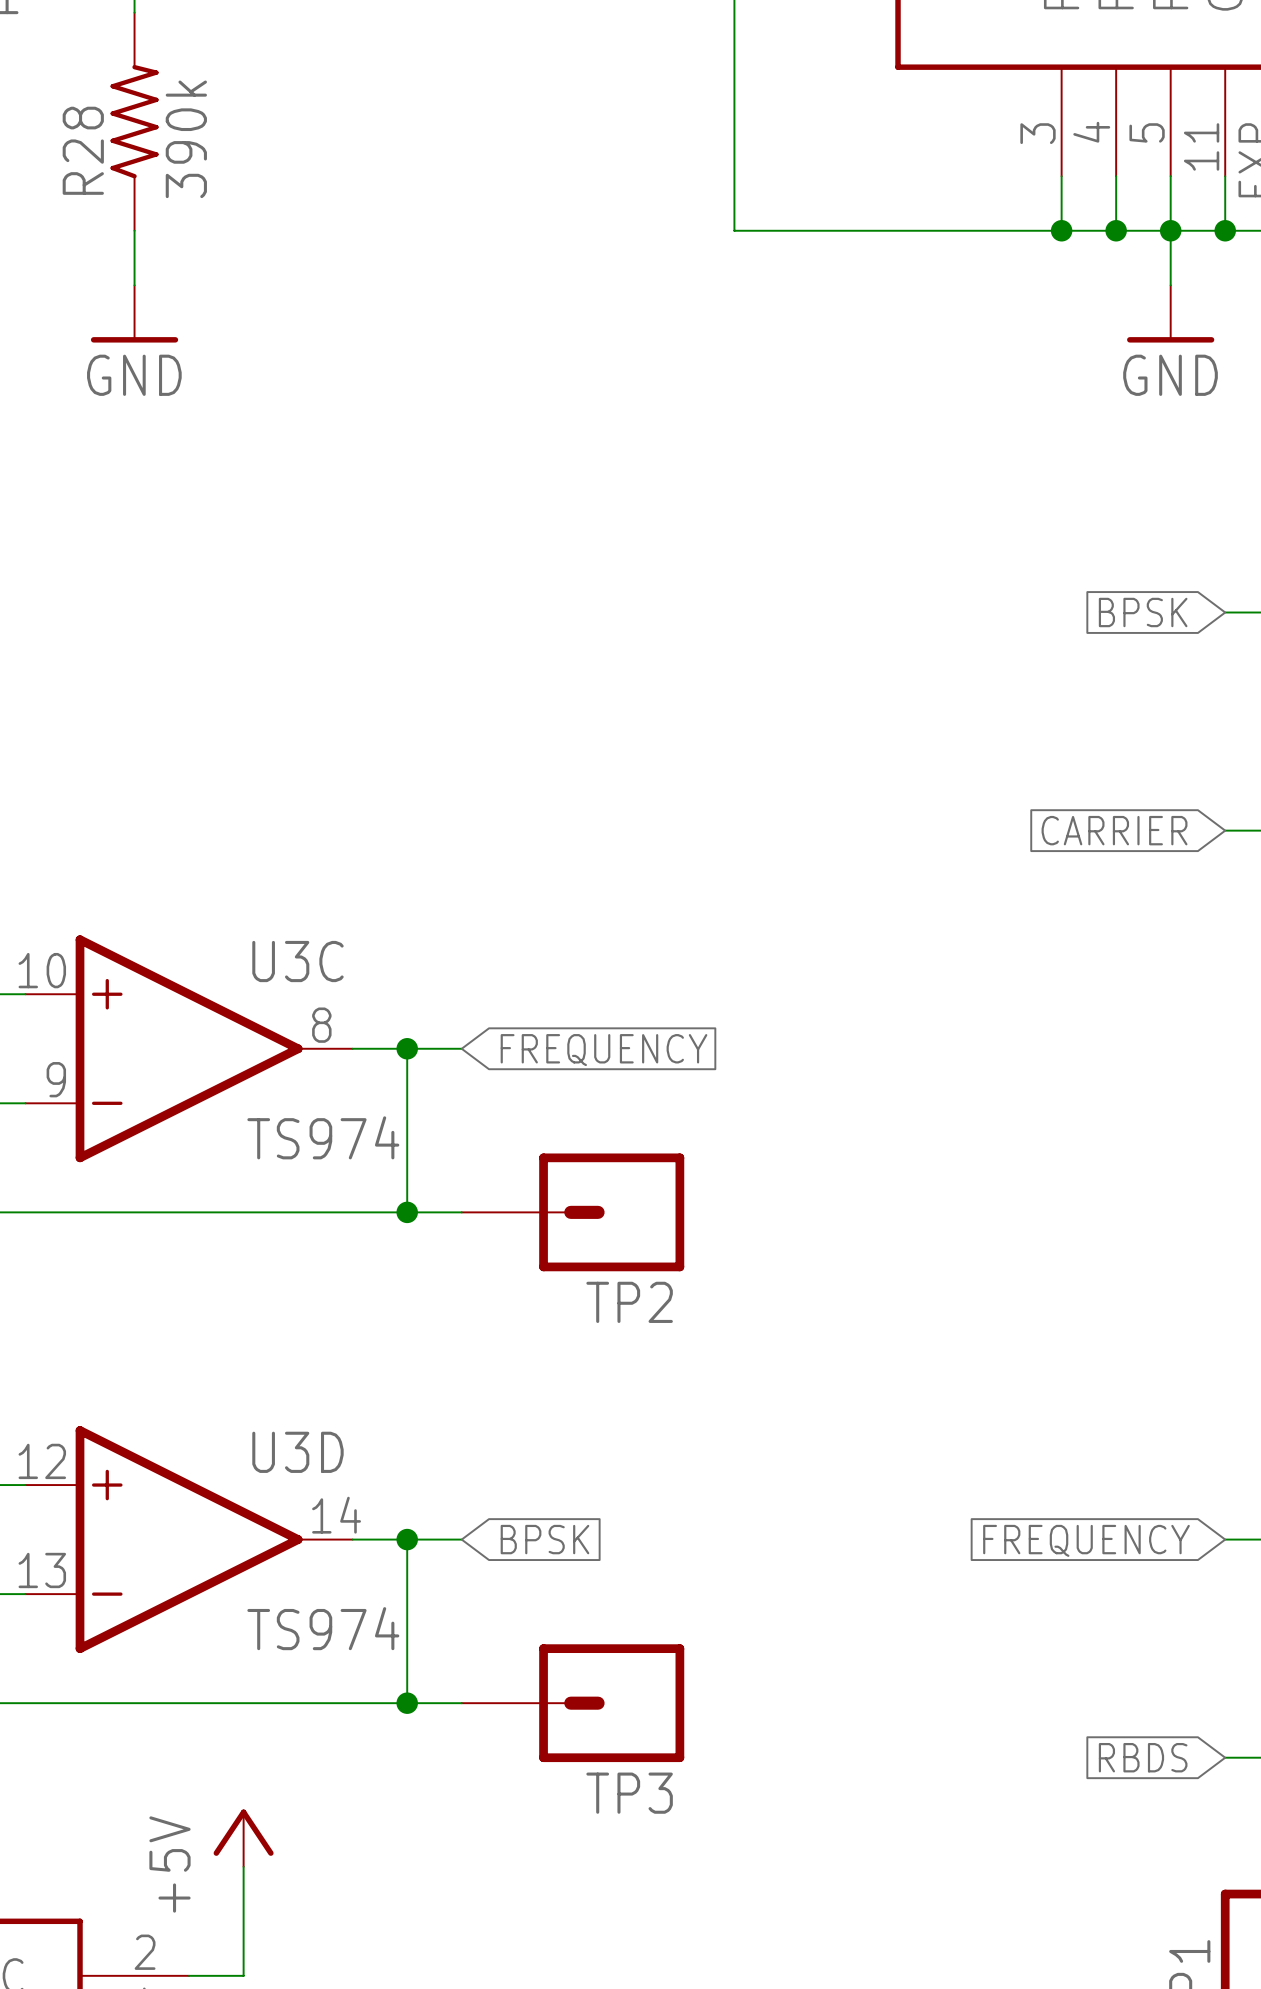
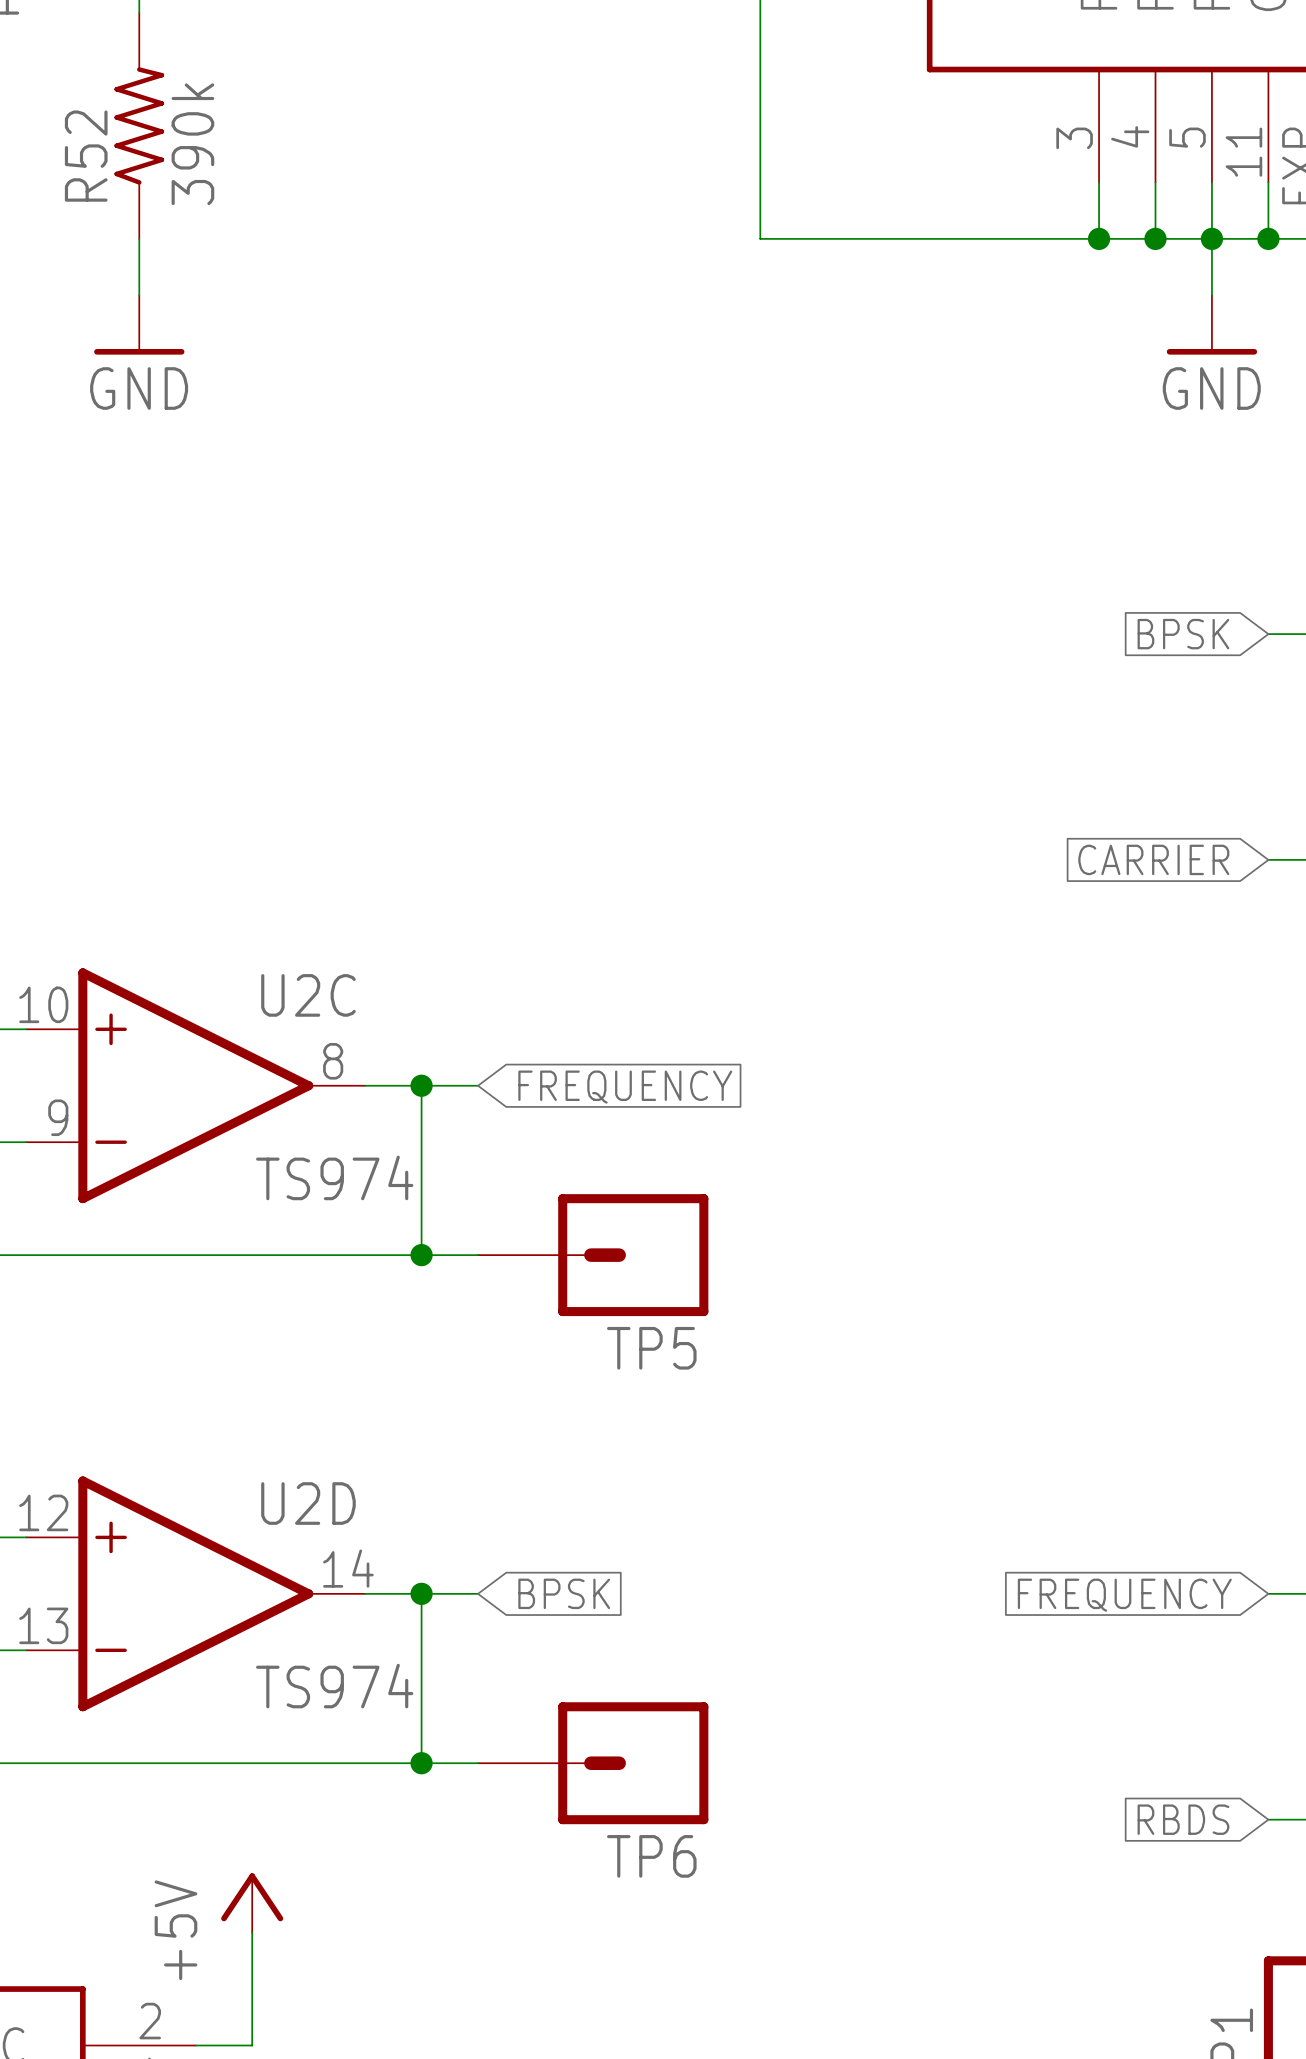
R28 name: R28 (83, 150) -> R52 (86, 156)
U3C name: U3C (297, 961) -> U2C (308, 995)
TP2 name: TP2 (629, 1302) -> TP5 (651, 1348)
U3D name: U3D (297, 1452) -> U2D (308, 1503)
TP3 name: TP3 (629, 1793) -> TP6 (651, 1856)

